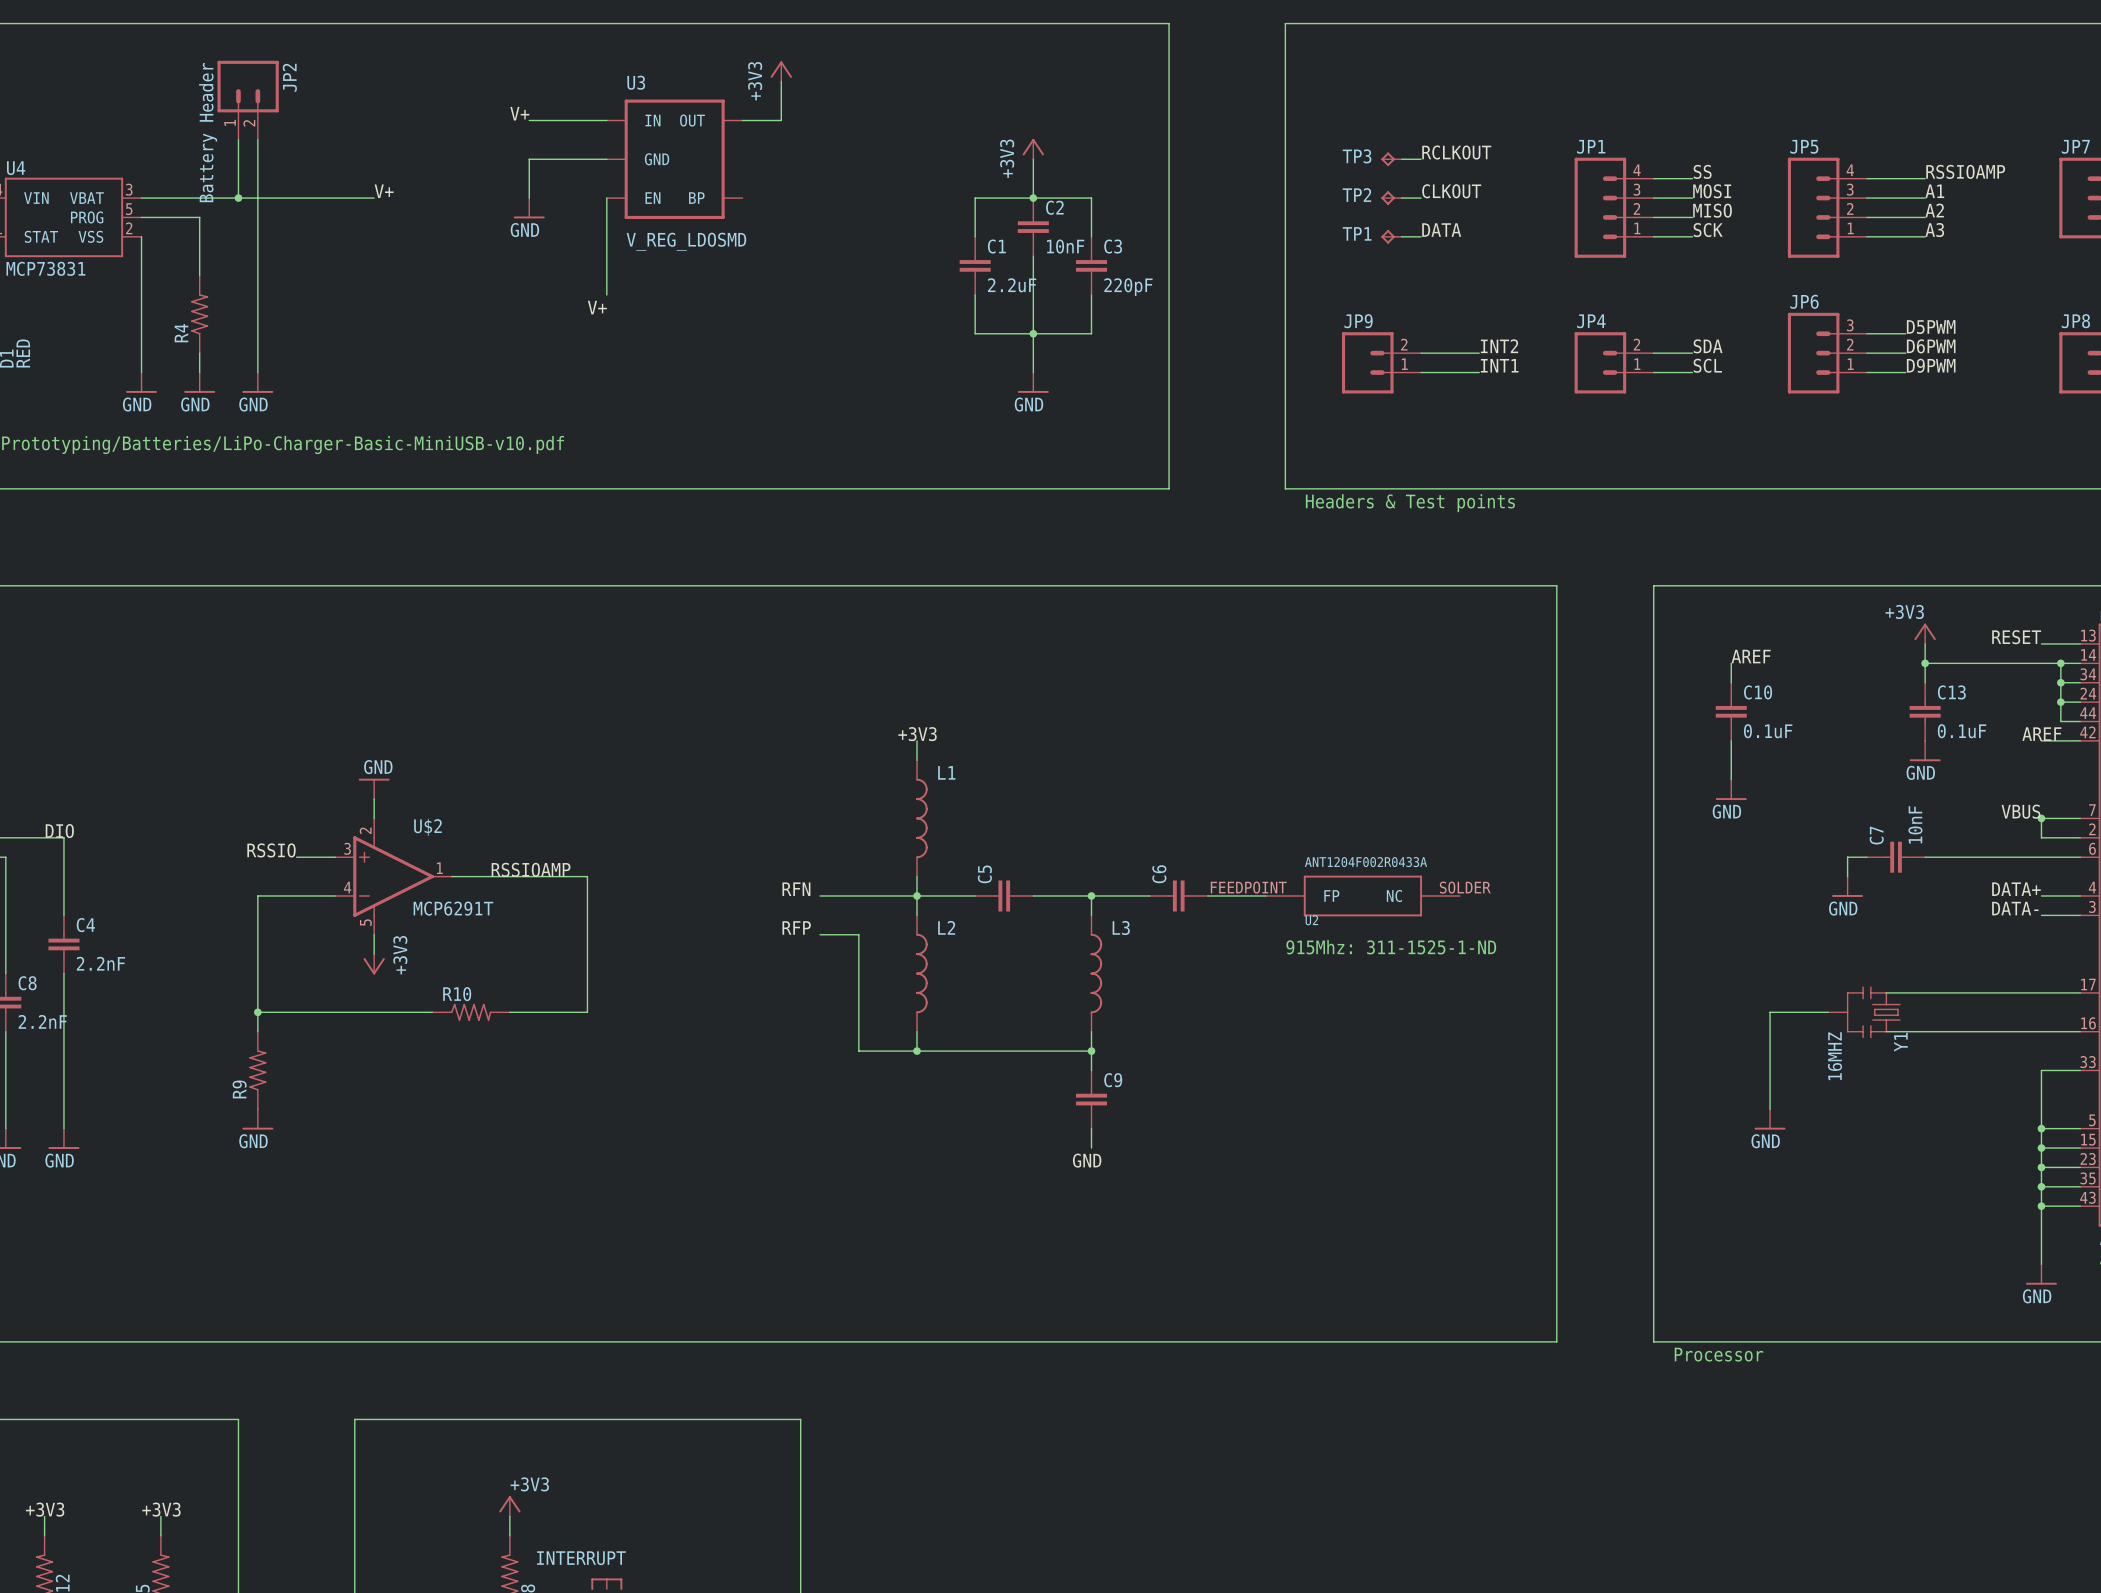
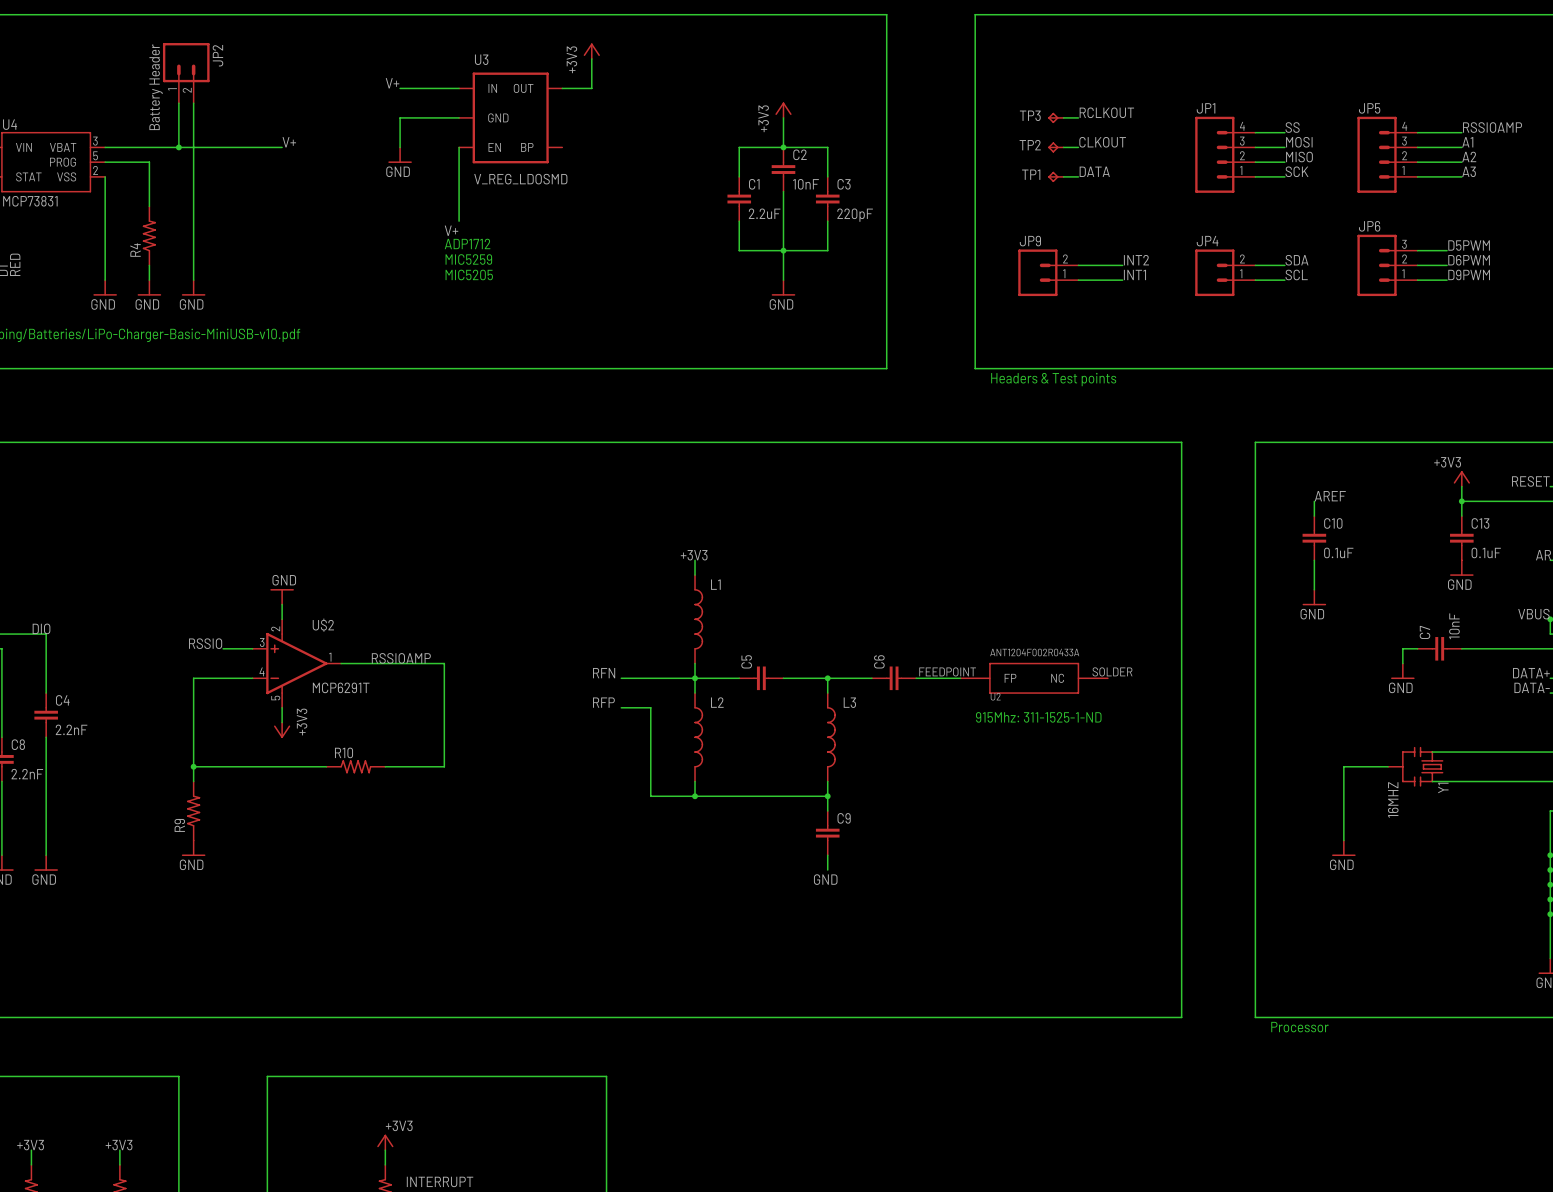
text: none -> ADP1712 (467, 243)
text: none -> MIC5259 (468, 259)
text: none -> MIC5205 (469, 274)

